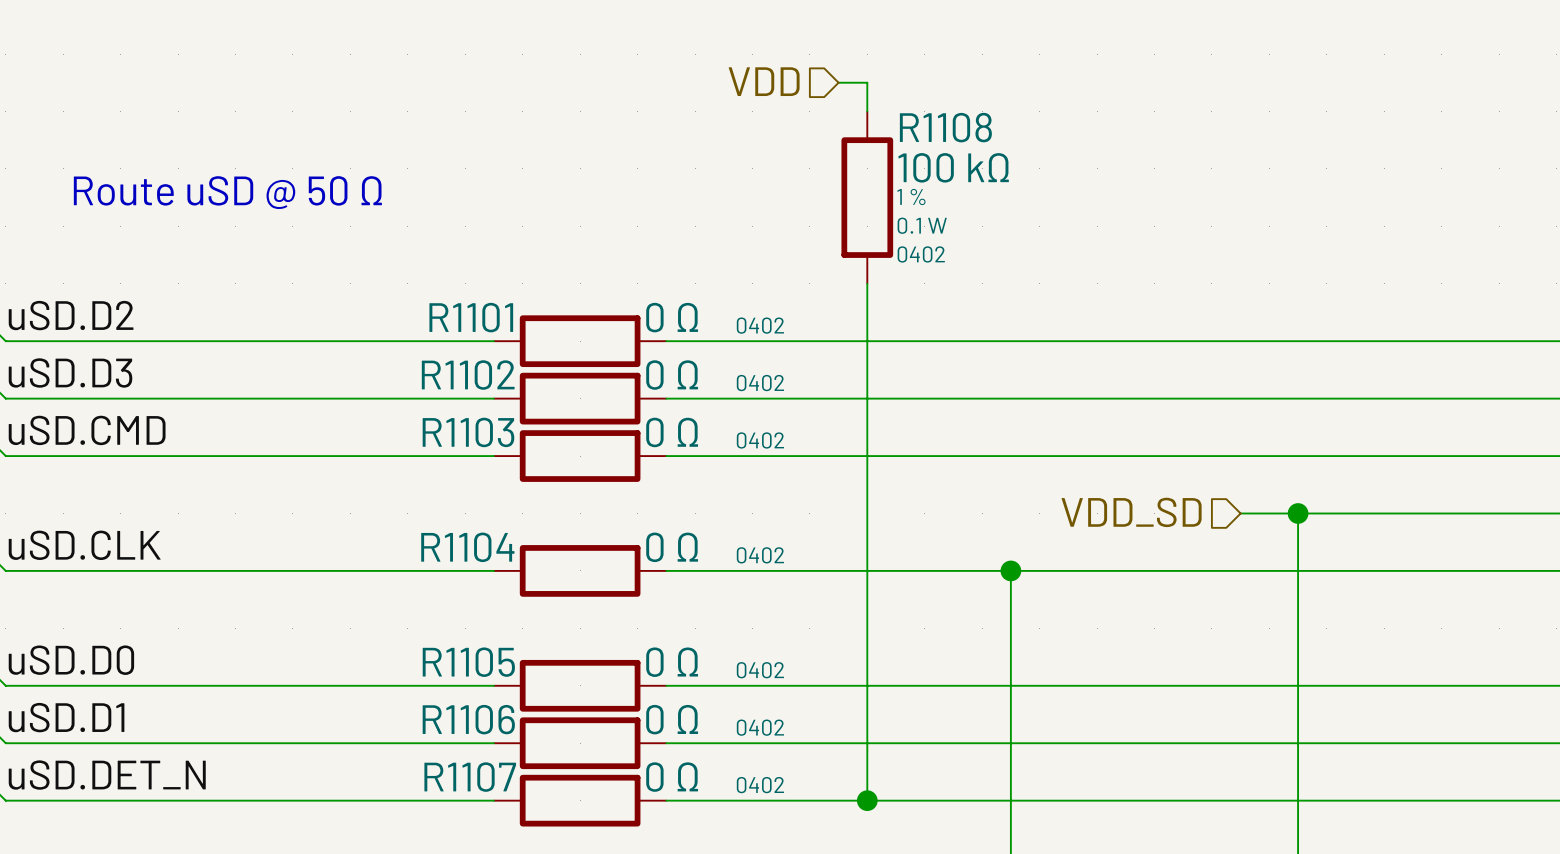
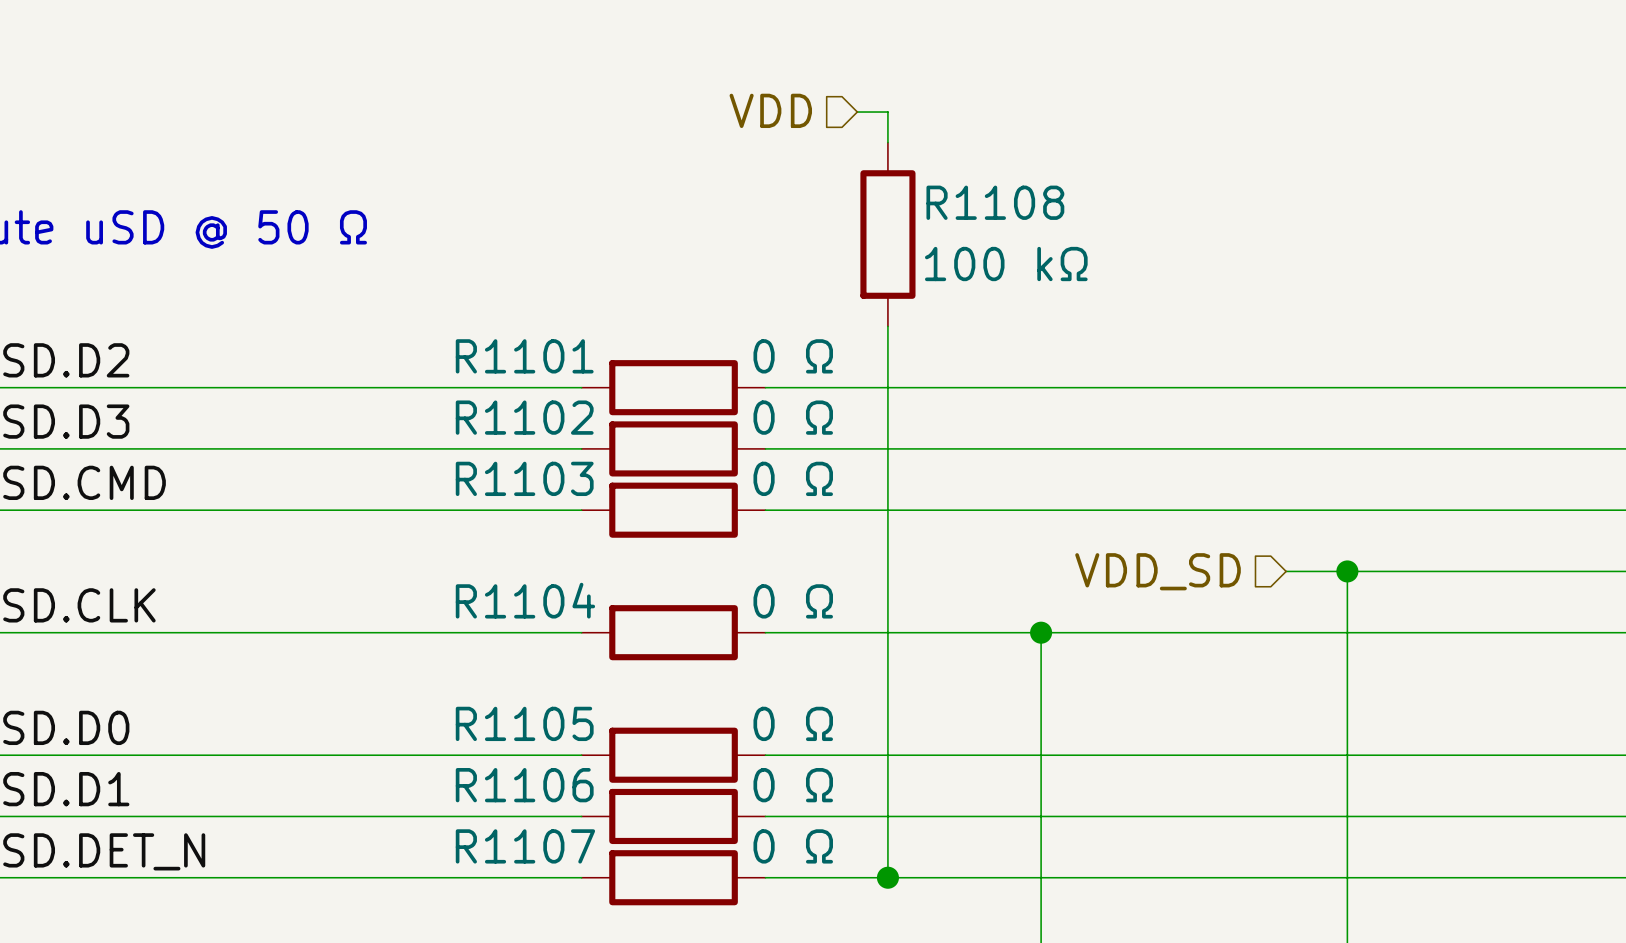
R1108 name position: R1108 (945, 127) -> R1108 (995, 202)
R1108 value position: 100 kΩ (953, 167) -> 100 kΩ (1006, 264)
R1108 text: 1 % (911, 197) -> none
R1108 text: 0.1 W (922, 225) -> none
R1108 text: 0402 (921, 254) -> none
R1101 name position: R1101 (471, 317) -> R1101 (524, 356)
R1101 value position: 0 Ω (672, 317) -> 0 Ω (793, 356)
R1101 text: 0402 (760, 325) -> none
R1101 position: (580, 341) -> (673, 387)
wire: (666, 341) (752, 341) -> (489, 387) (581, 387)
R1102 name position: R1102 (468, 375) -> R1102 (524, 417)
R1102 value position: 0 Ω (672, 375) -> 0 Ω (793, 417)
R1102 text: 0402 (760, 383) -> none
R1102 position: (580, 398) -> (673, 448)
wire: (666, 398) (752, 398) -> (489, 448) (581, 448)
R1103 name position: R1103 (468, 432) -> R1103 (524, 478)
R1103 value position: 0 Ω (672, 432) -> 0 Ω (793, 478)
R1103 text: 0402 (760, 440) -> none
R1103 position: (580, 456) -> (673, 510)
wire: (666, 456) (752, 456) -> (489, 510) (581, 510)
R1104 name position: R1104 (467, 547) -> R1104 (525, 600)
R1104 value position: 0 Ω (672, 547) -> 0 Ω (793, 601)
R1104 text: 0402 (760, 555) -> none
R1104 position: (580, 570) -> (673, 632)
wire: (666, 570) (752, 570) -> (489, 632) (581, 632)
R1105 name position: R1105 (468, 662) -> R1105 (524, 723)
R1105 value position: 0 Ω (672, 662) -> 0 Ω (793, 723)
R1105 text: 0402 (760, 670) -> none
R1105 position: (580, 685) -> (673, 755)
wire: (666, 685) (752, 685) -> (489, 755) (581, 755)
R1106 name position: R1106 (468, 719) -> R1106 (524, 785)
R1106 value position: 0 Ω (672, 719) -> 0 Ω (793, 785)
R1106 text: 0402 (760, 727) -> none
R1106 position: (580, 743) -> (673, 816)
wire: (666, 743) (752, 743) -> (489, 816) (581, 816)
R1107 name position: R1107 (470, 777) -> R1107 (525, 846)
R1107 value position: 0 Ω (672, 777) -> 0 Ω (793, 846)
R1107 text: 0402 (760, 785) -> none
R1107 position: (580, 800) -> (673, 877)
wire: (666, 800) (752, 800) -> (489, 877) (581, 877)

